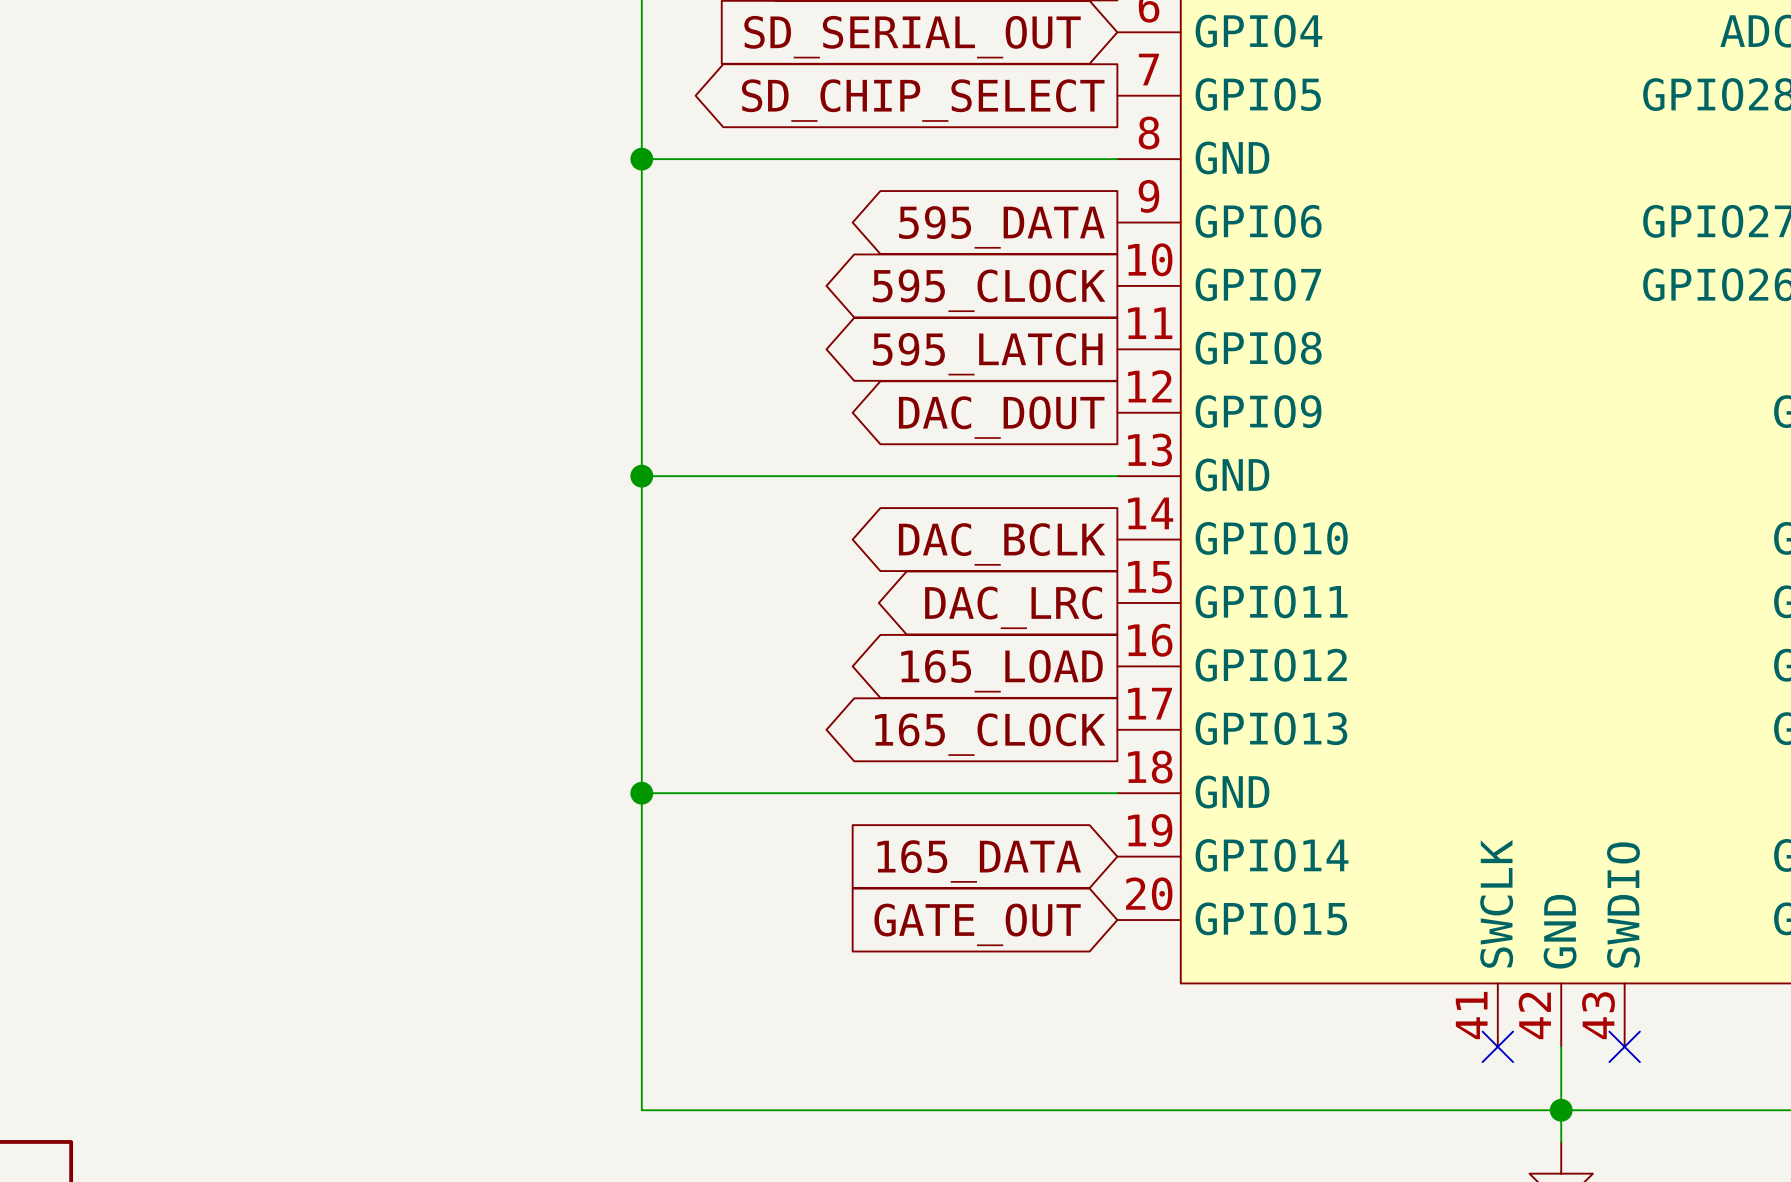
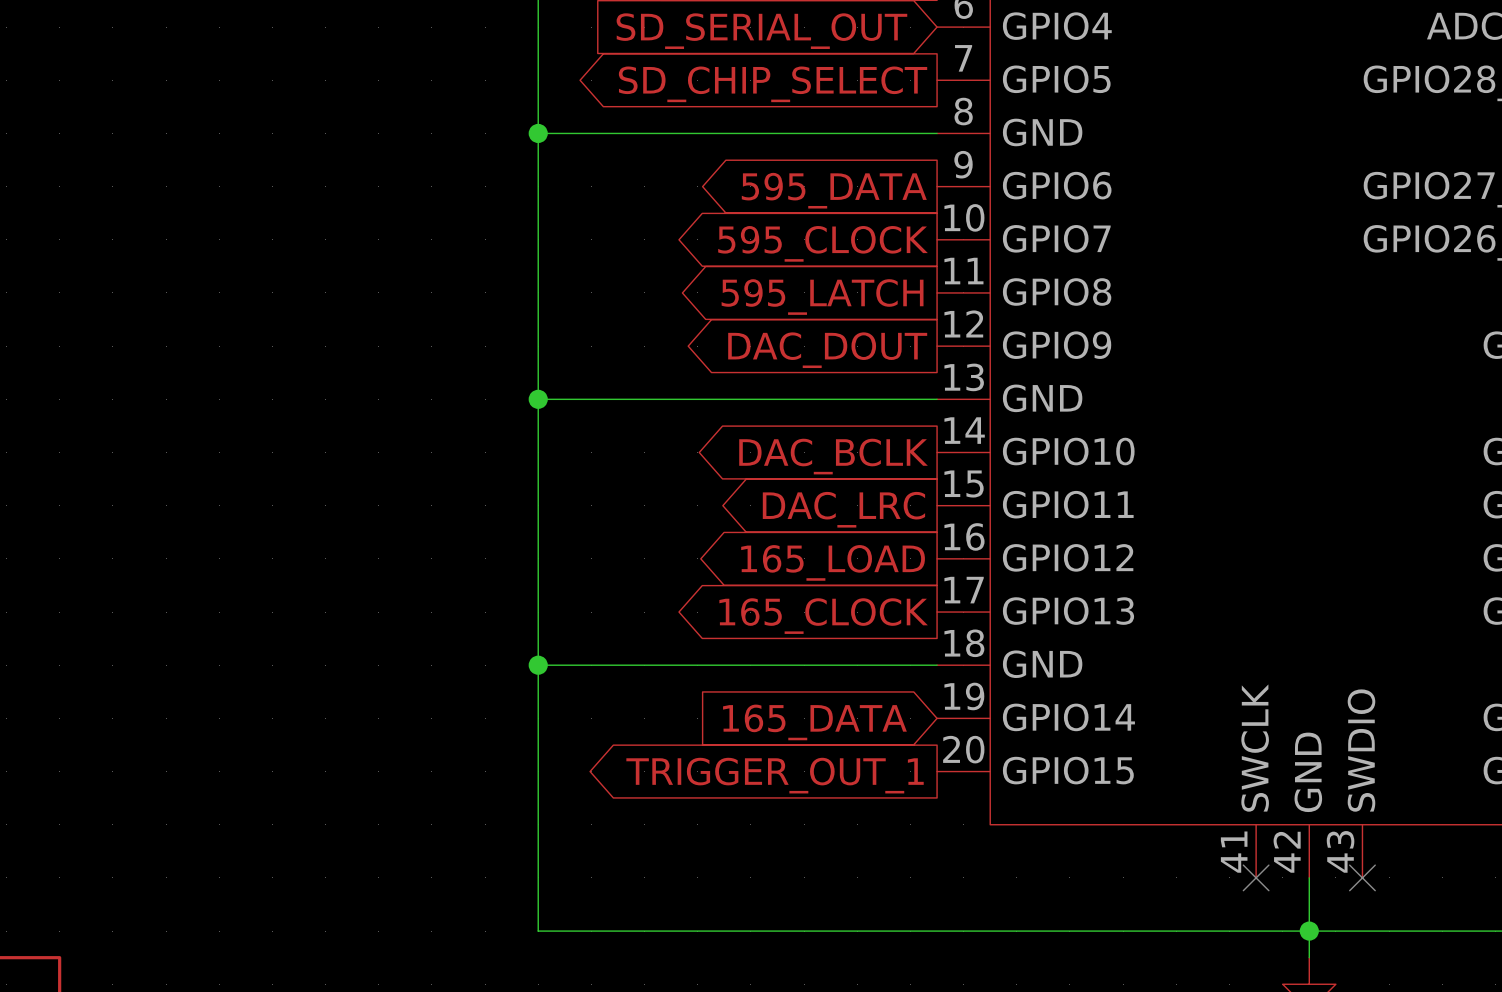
global label shape: input (977, 924) -> output (775, 775)
global label: GATE_OUT (977, 924) -> TRIGGER_OUT_1 (775, 775)

